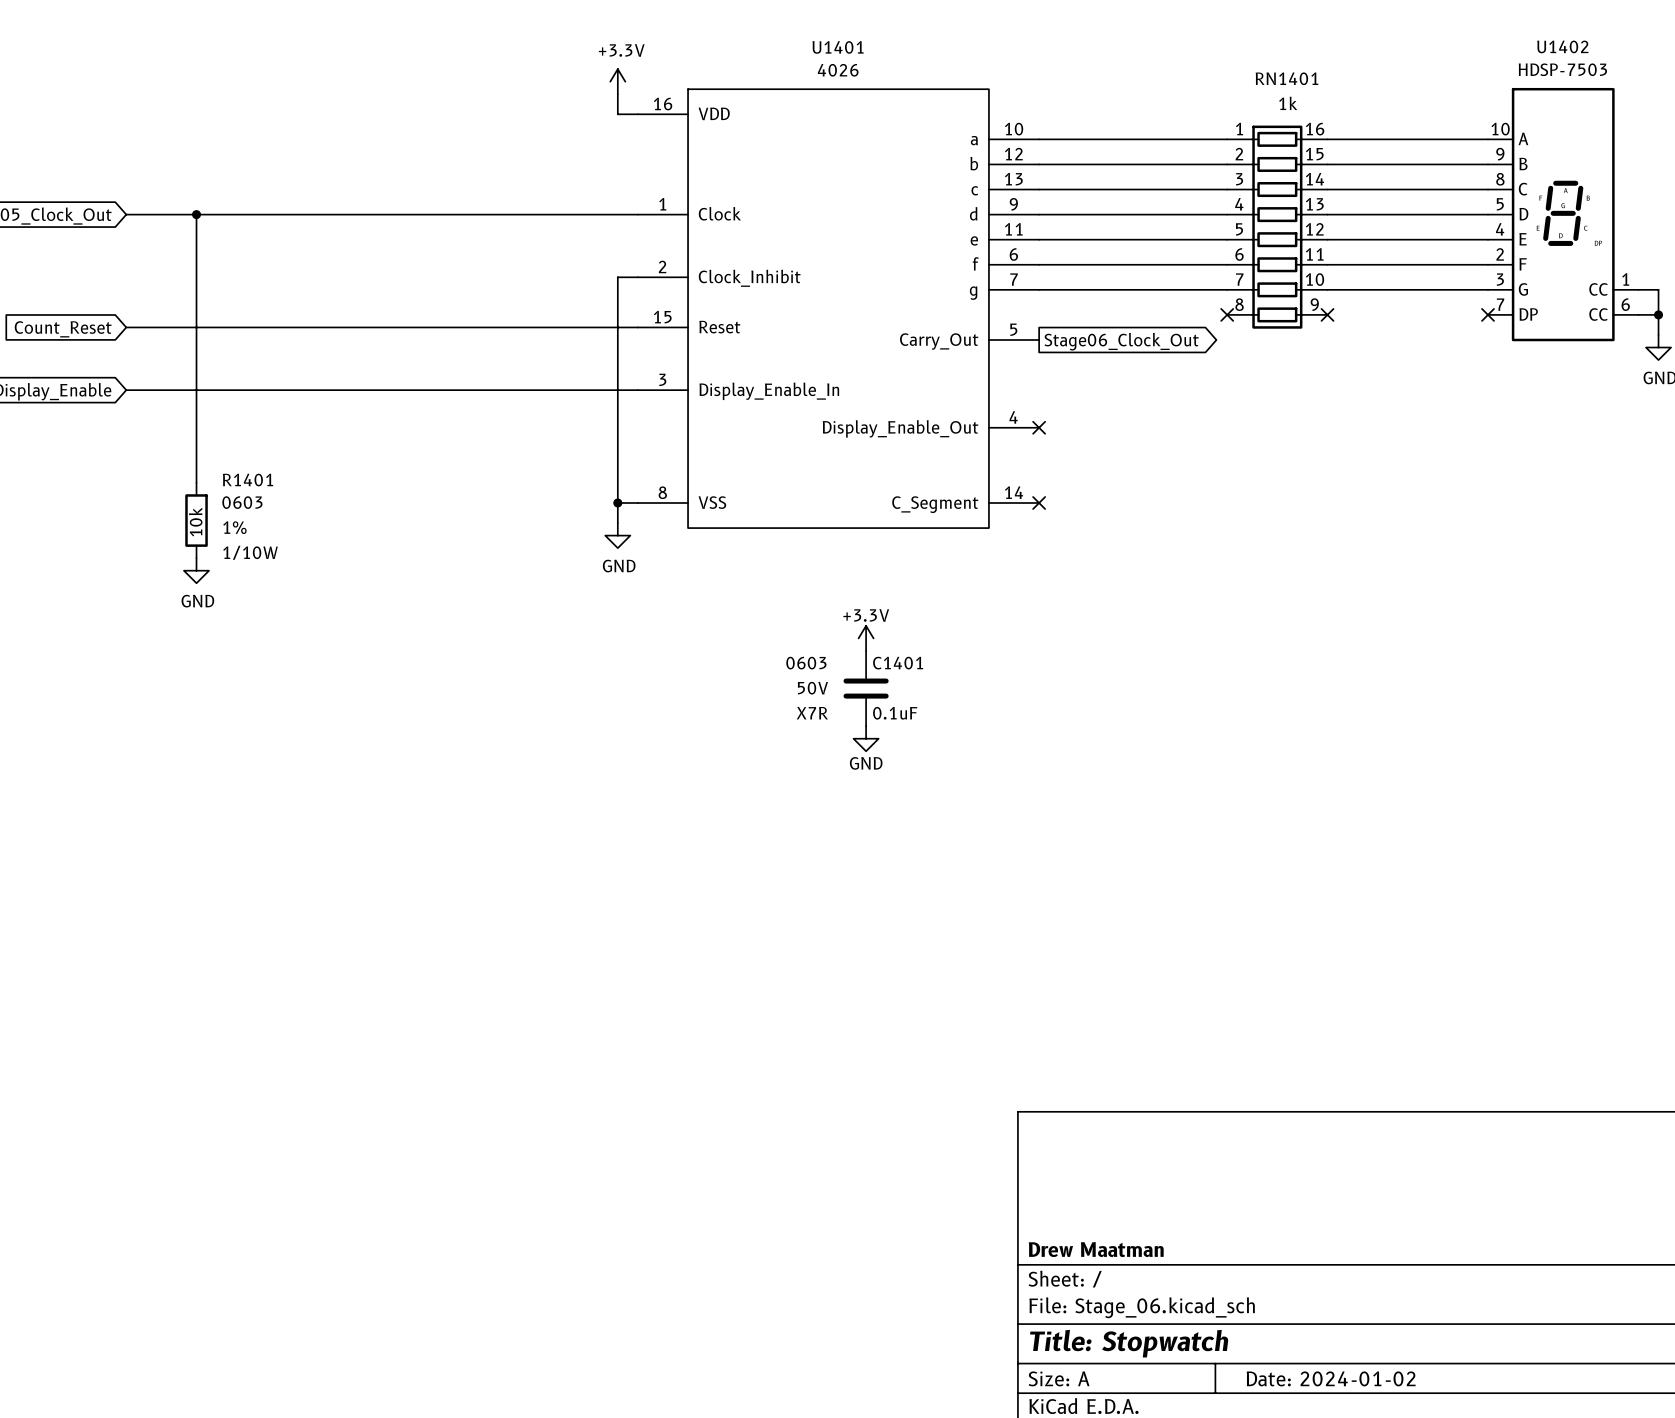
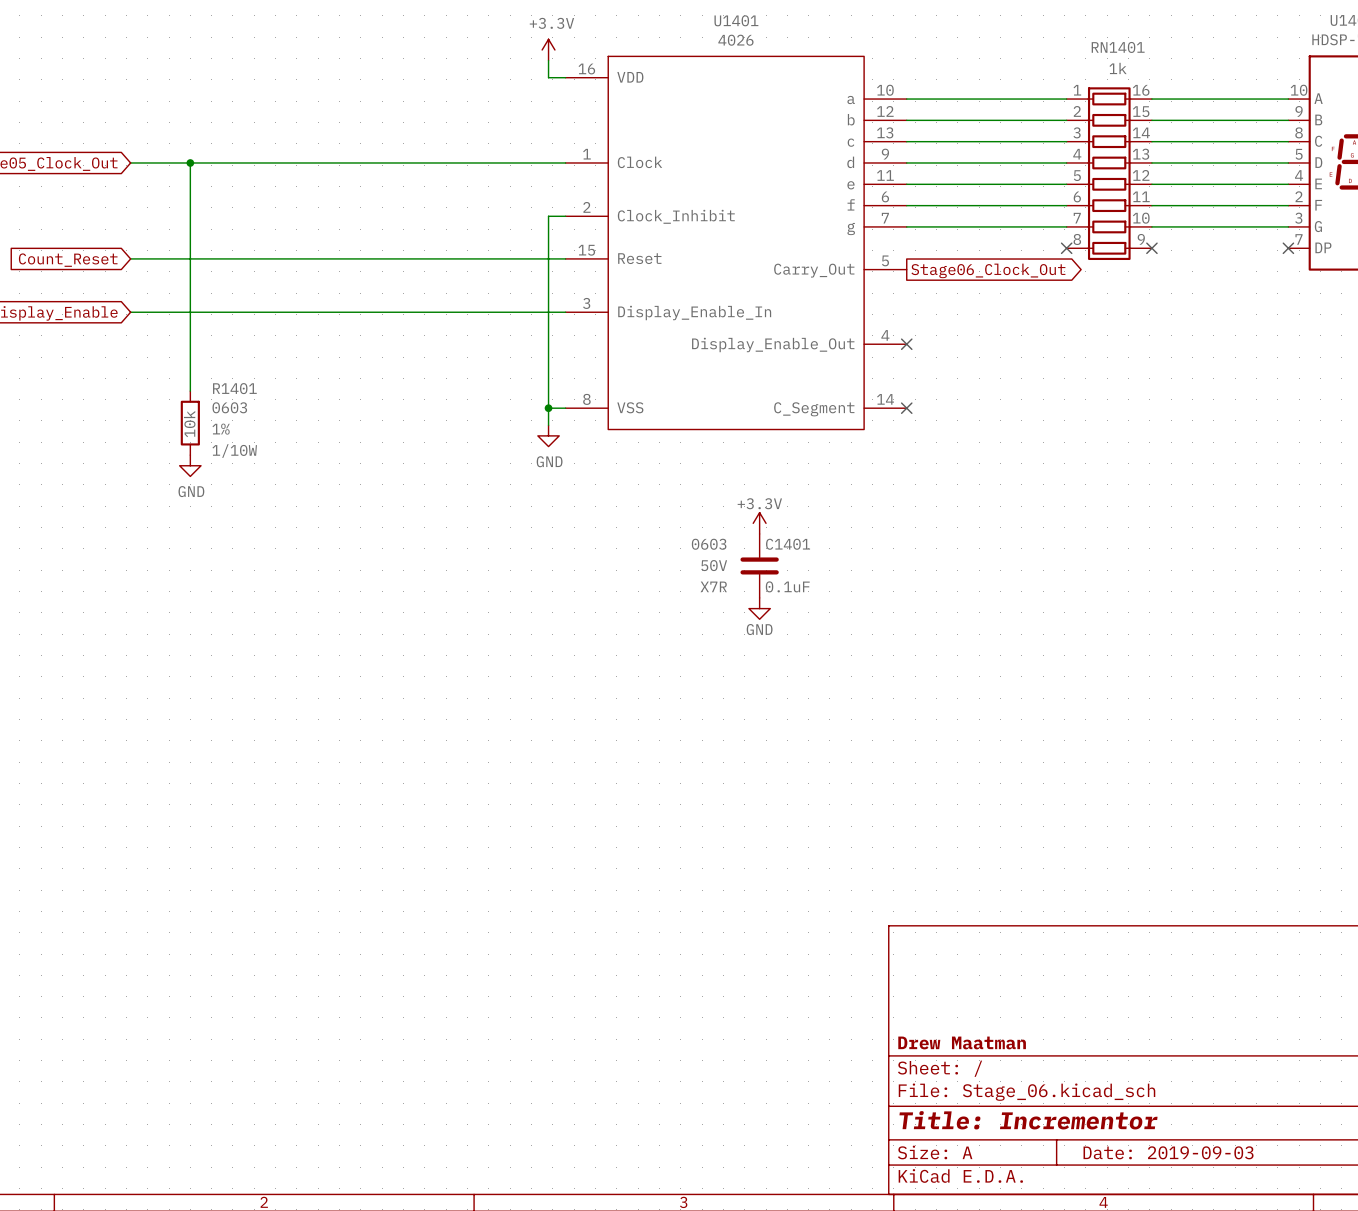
title block: Title: Stopwatch (1129, 1343) -> Title: Incrementor (1028, 1120)
title block: Date: 2024-01-02 (1331, 1378) -> Date: 2019-09-03 (1168, 1152)

